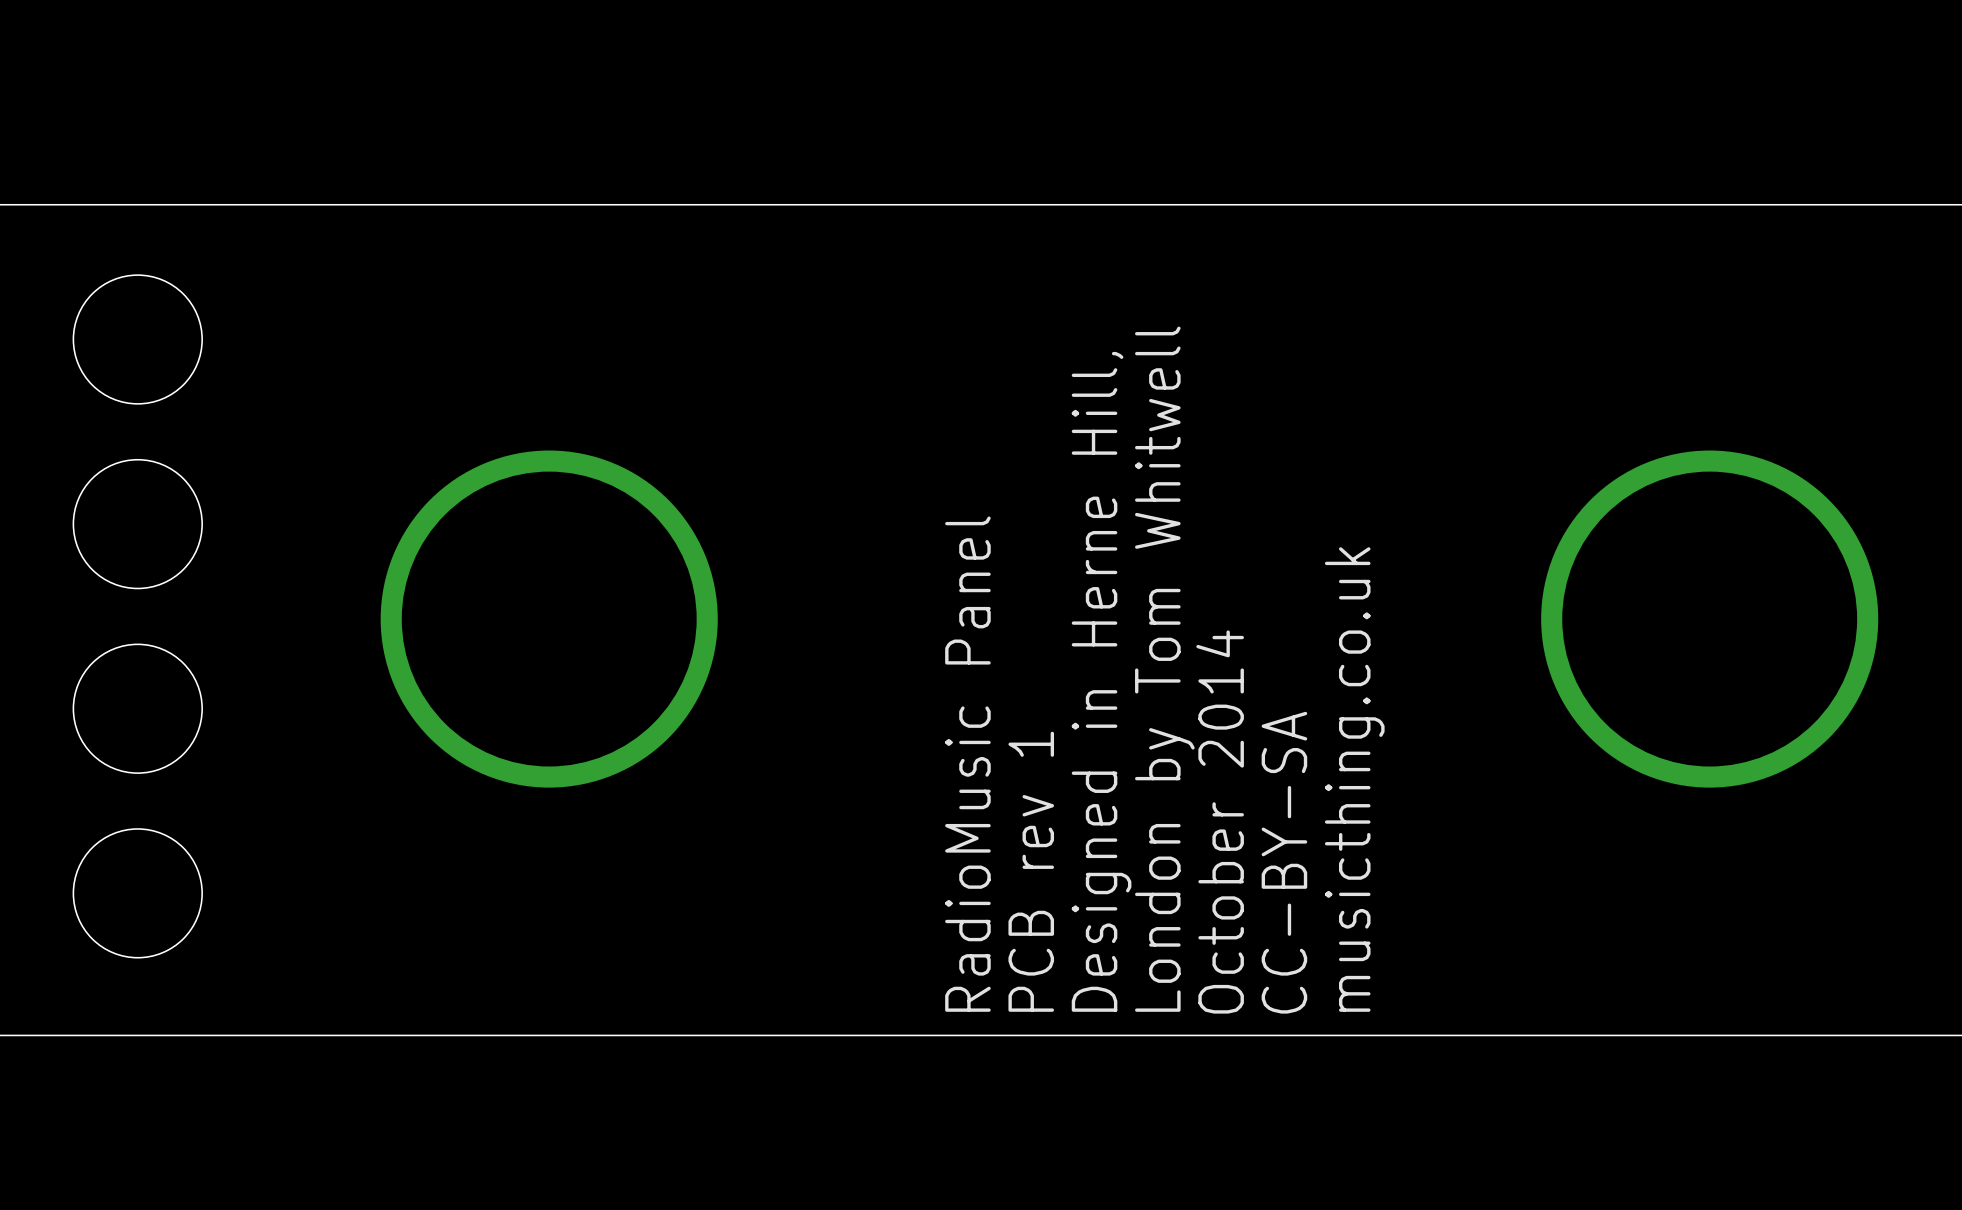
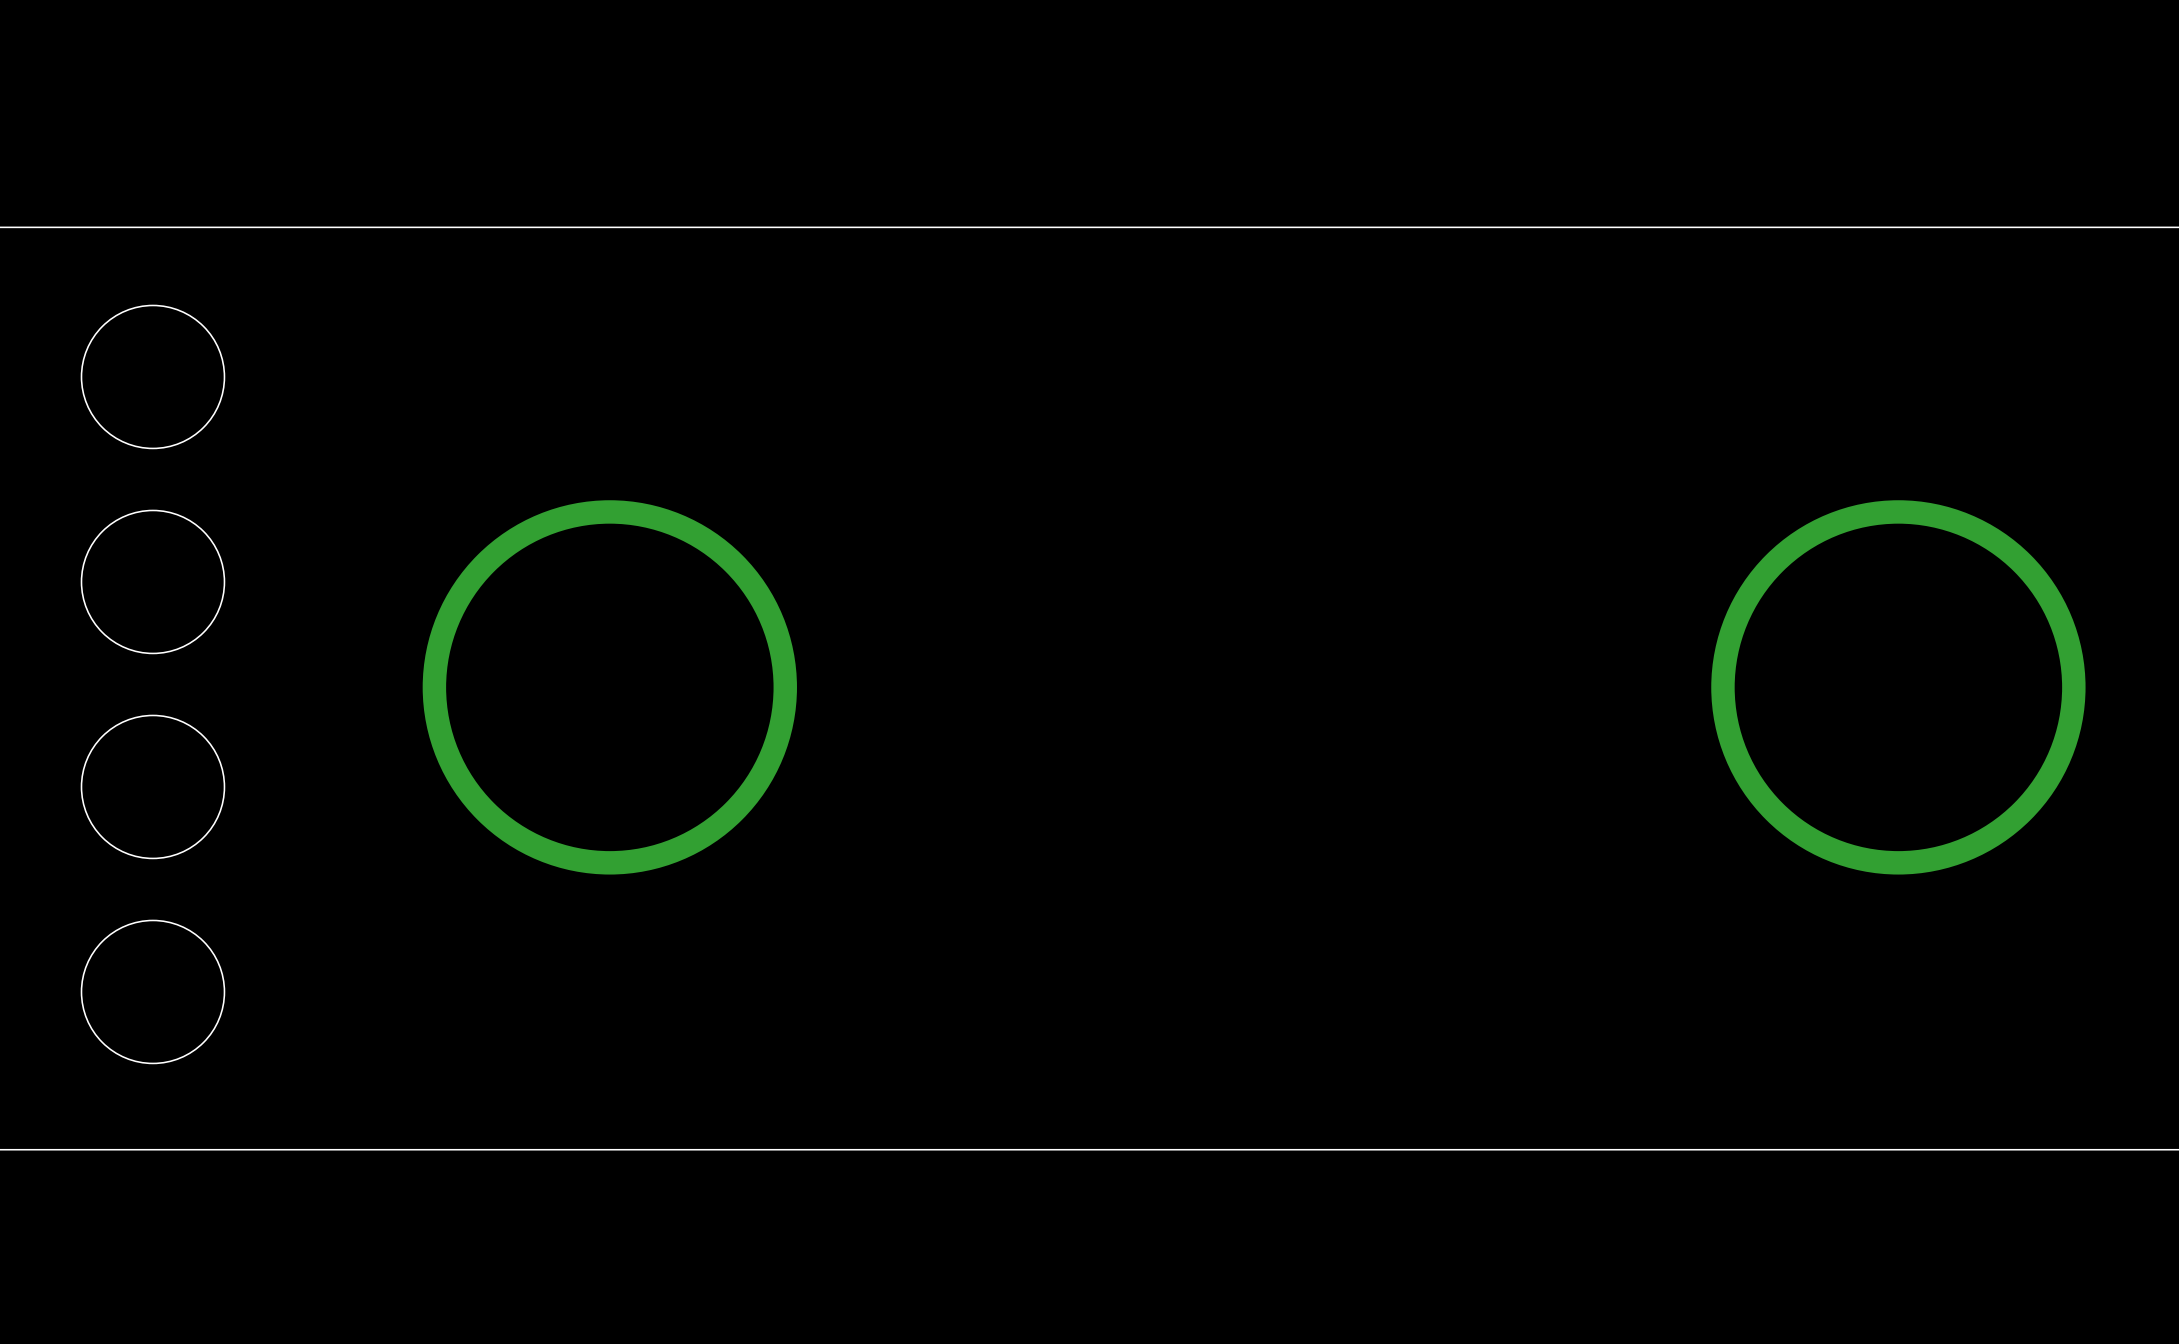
text: London by Tom Whitwell (1164, 669) -> none
text: Designed in Herne Hill, (1101, 681) -> none
text: RadioMusic Panel (967, 764) -> none
text: musicthing.co.uk (1354, 779) -> none
text: October 2014 (1220, 822) -> none
text: CC-BY-SA (1284, 862) -> none
text: PCB rev 1 (1031, 871) -> none

